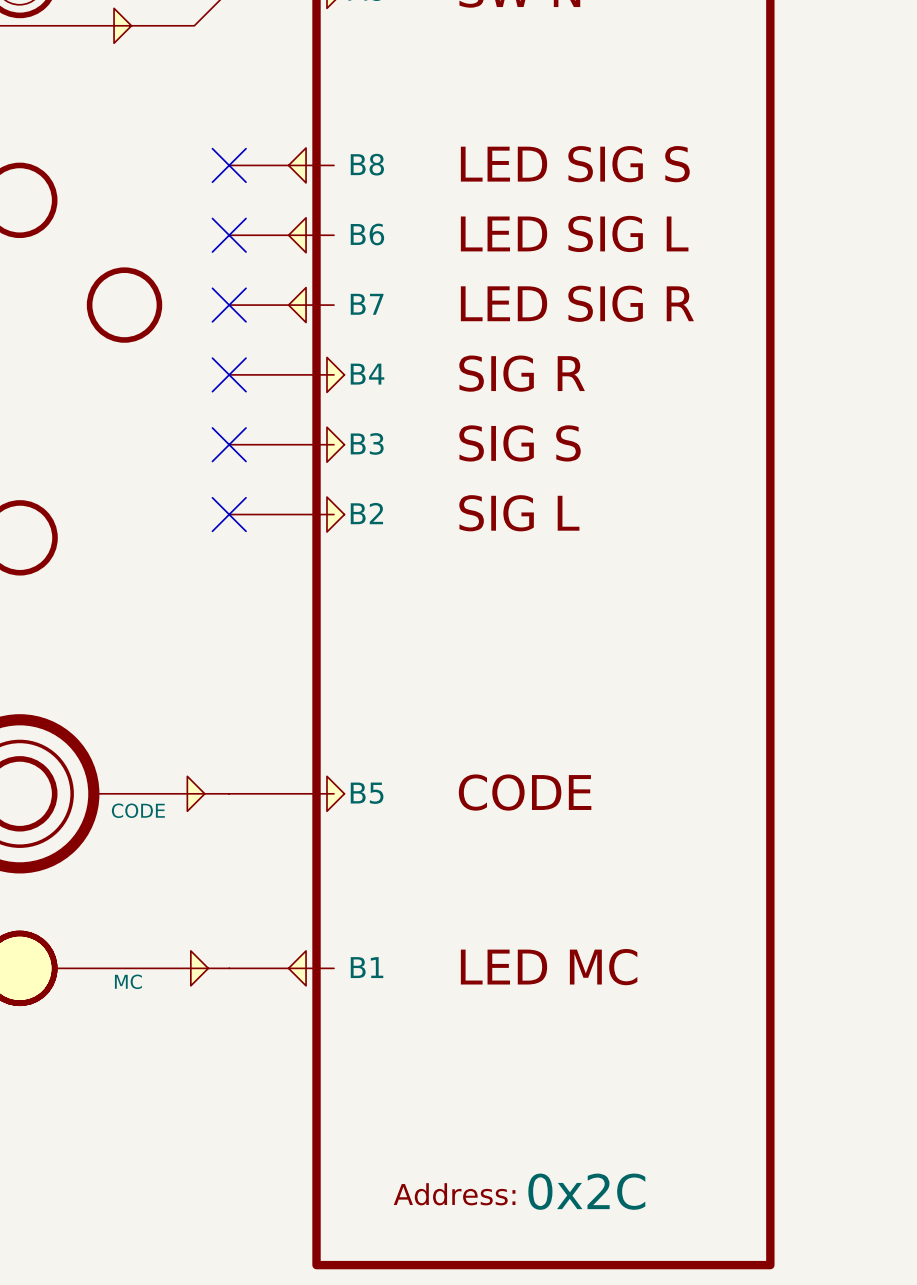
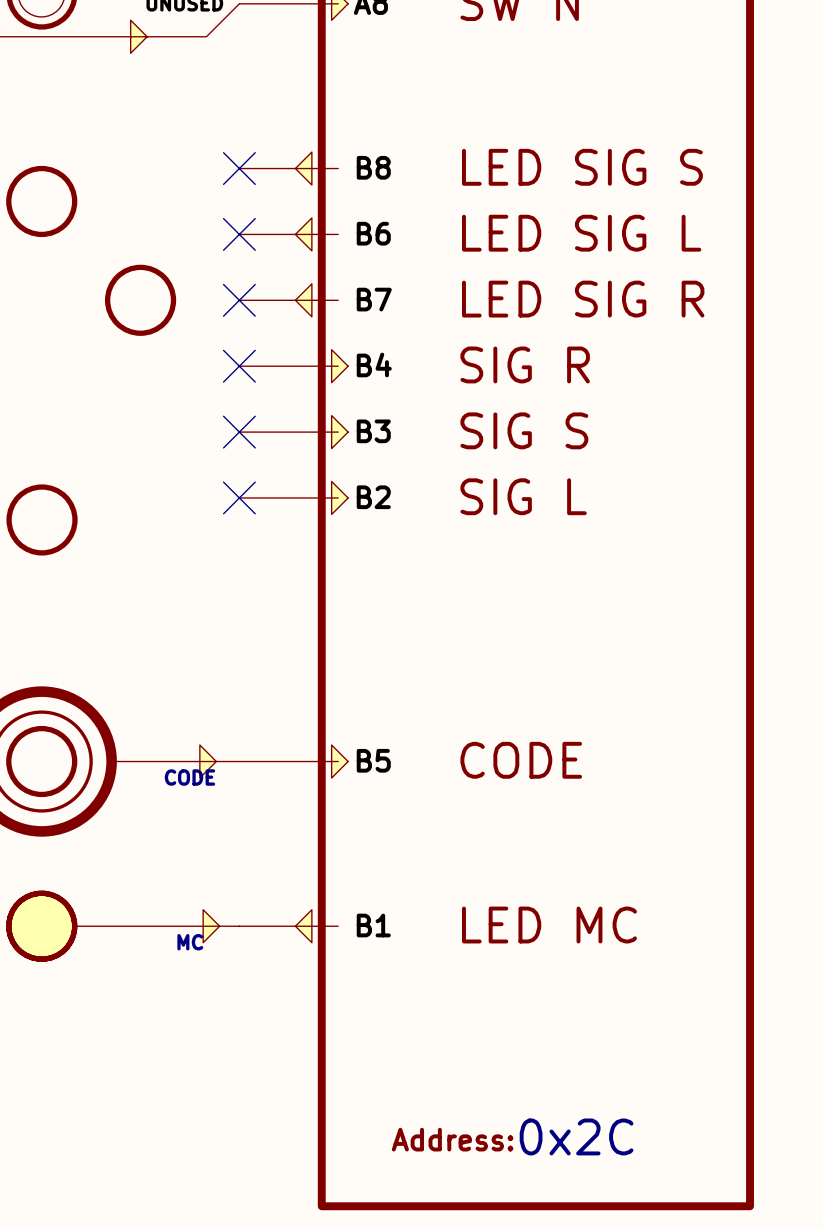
part value position: CODE (138, 810) -> CODE (189, 777)
part value position: MC (128, 981) -> MC (190, 942)

